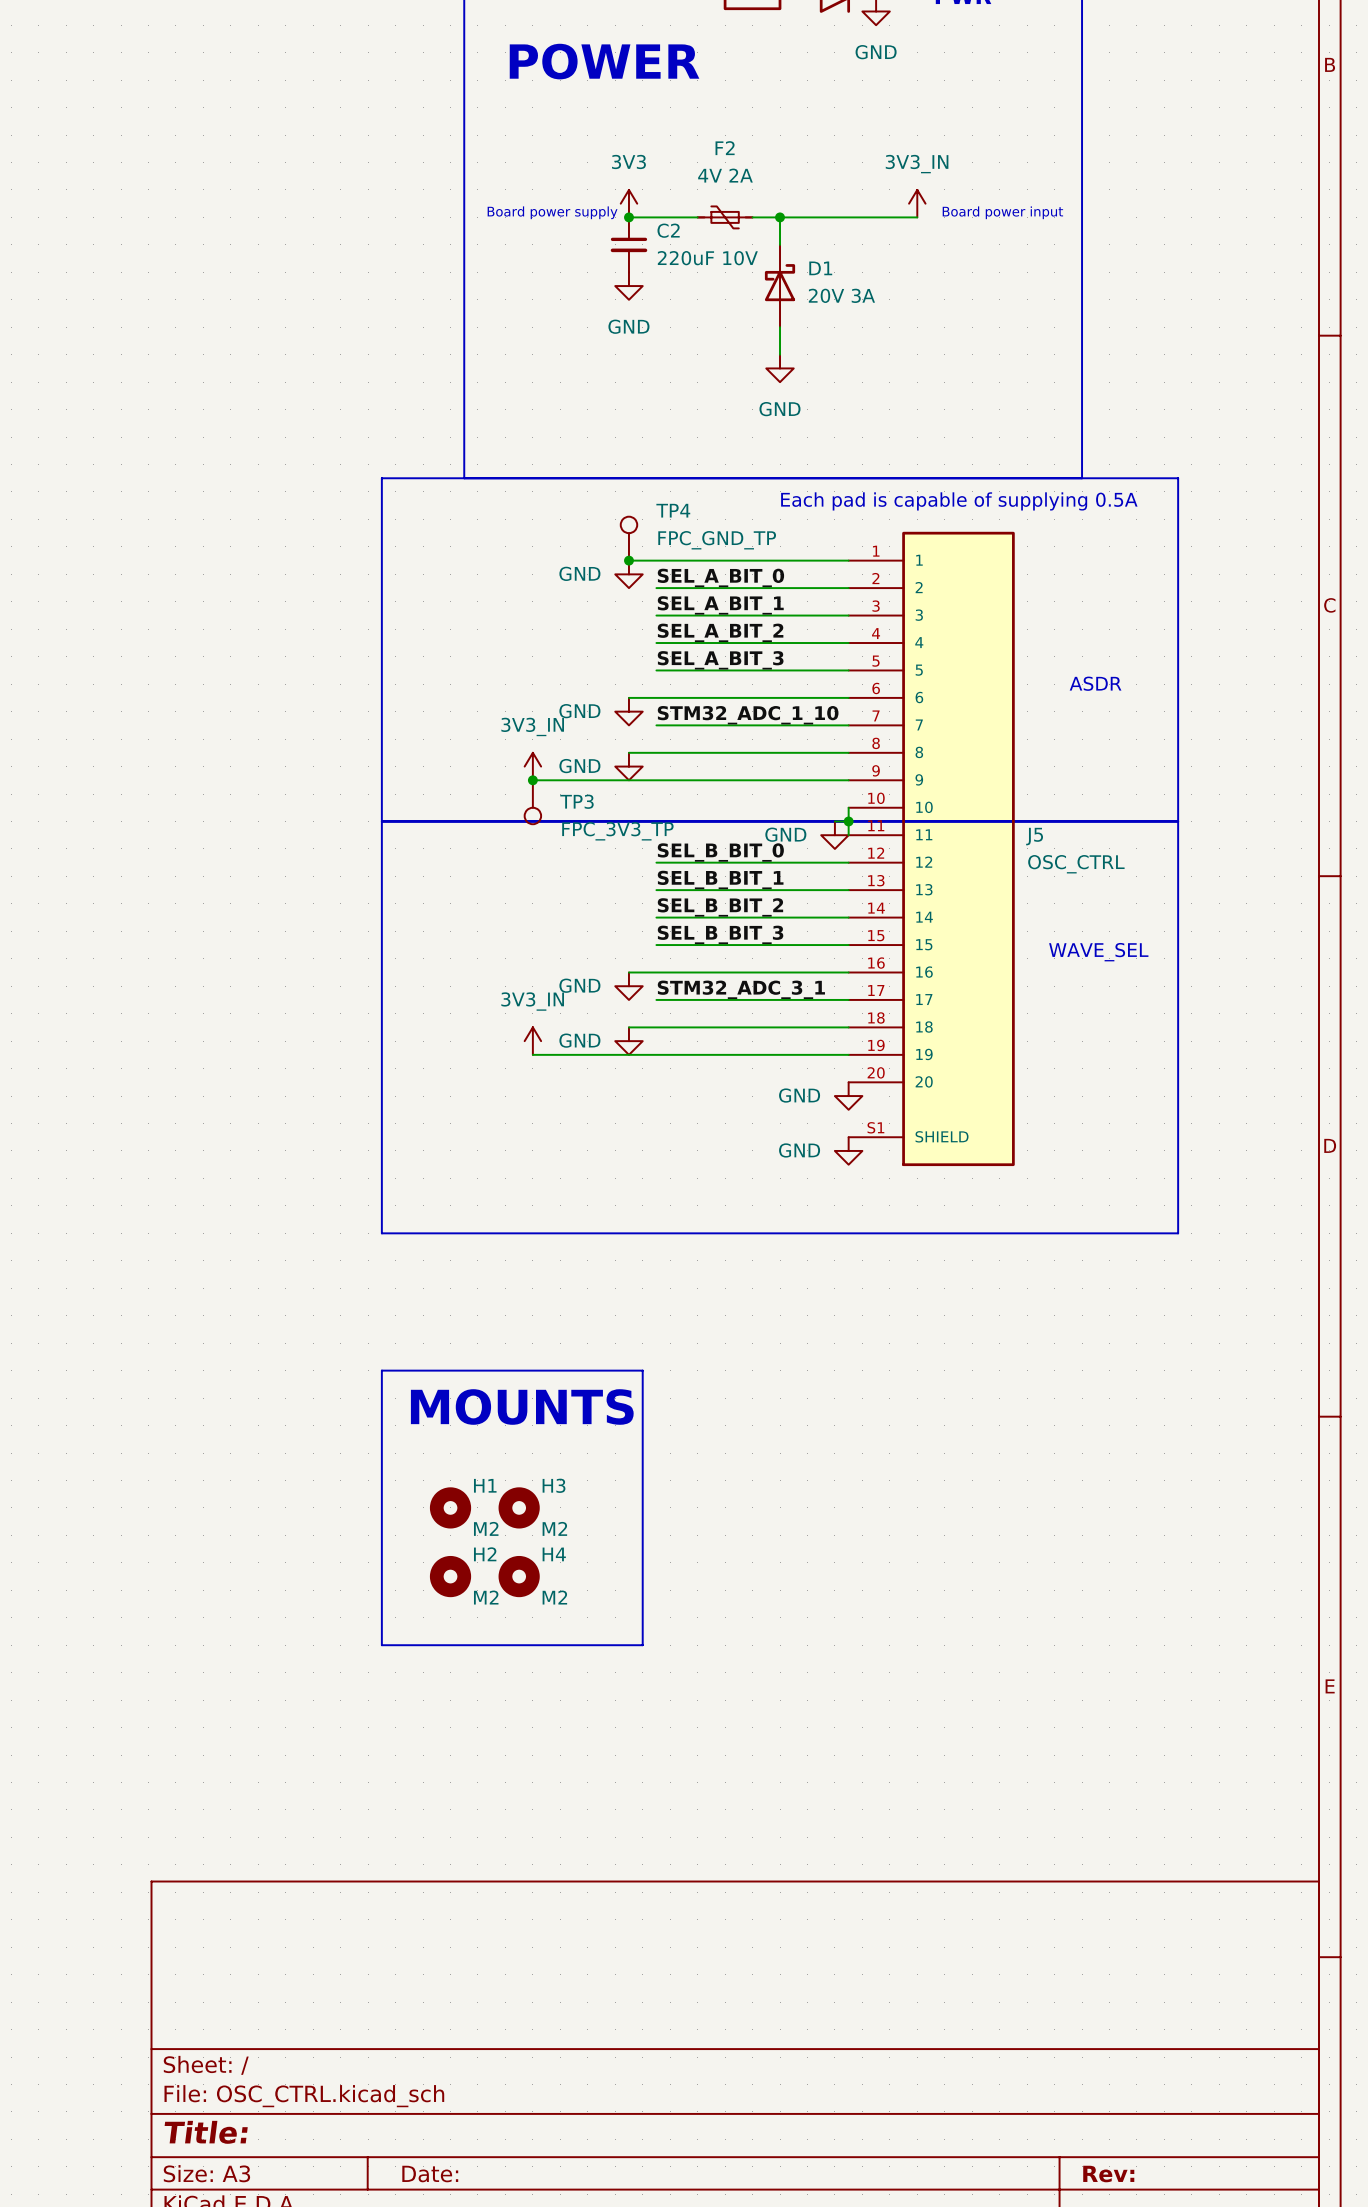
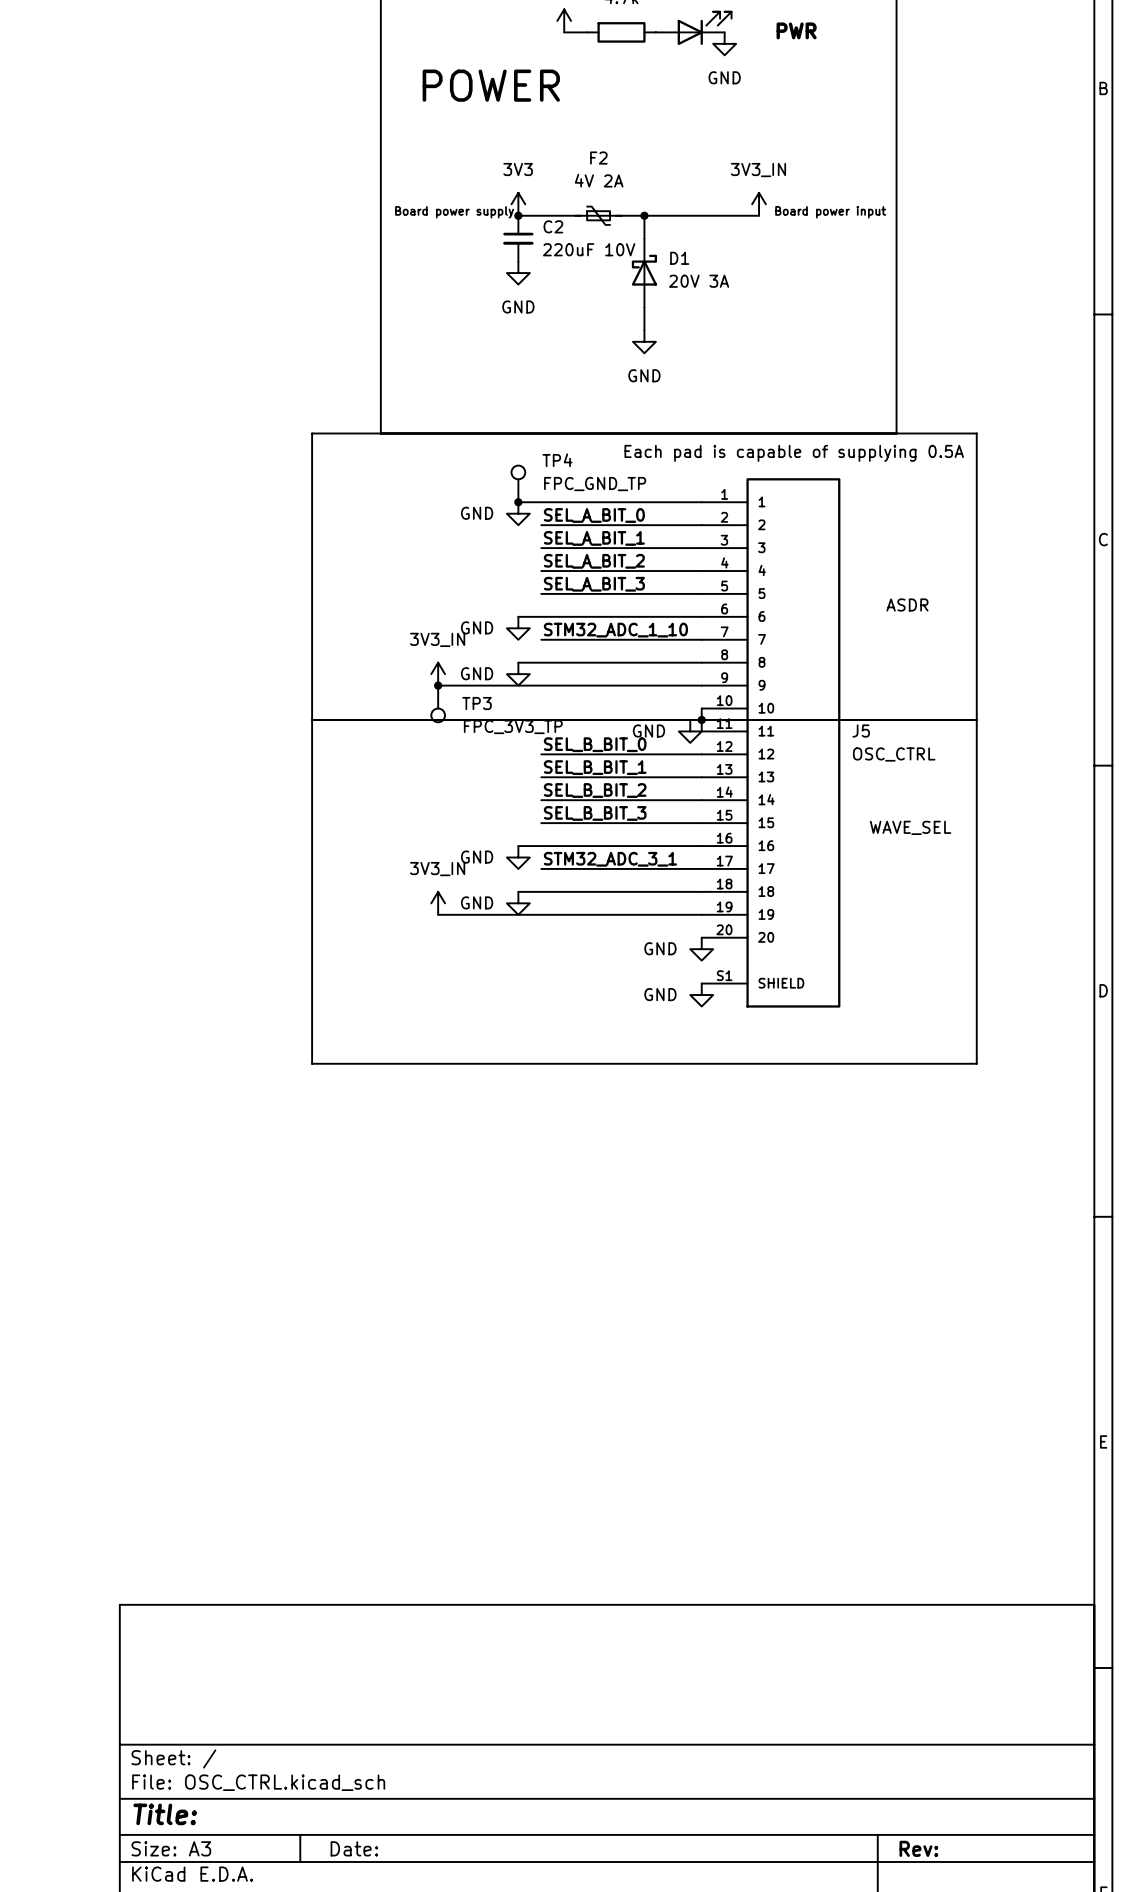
line: (381, 1370) (642, 1370) (642, 1645) (381, 1645) (381, 1370) -> none
text: MOUNTS (522, 1406) -> none
H1: M2 (450, 1507) -> none
H3: M2 (519, 1507) -> none
H2: M2 (450, 1576) -> none
H4: M2 (519, 1576) -> none

